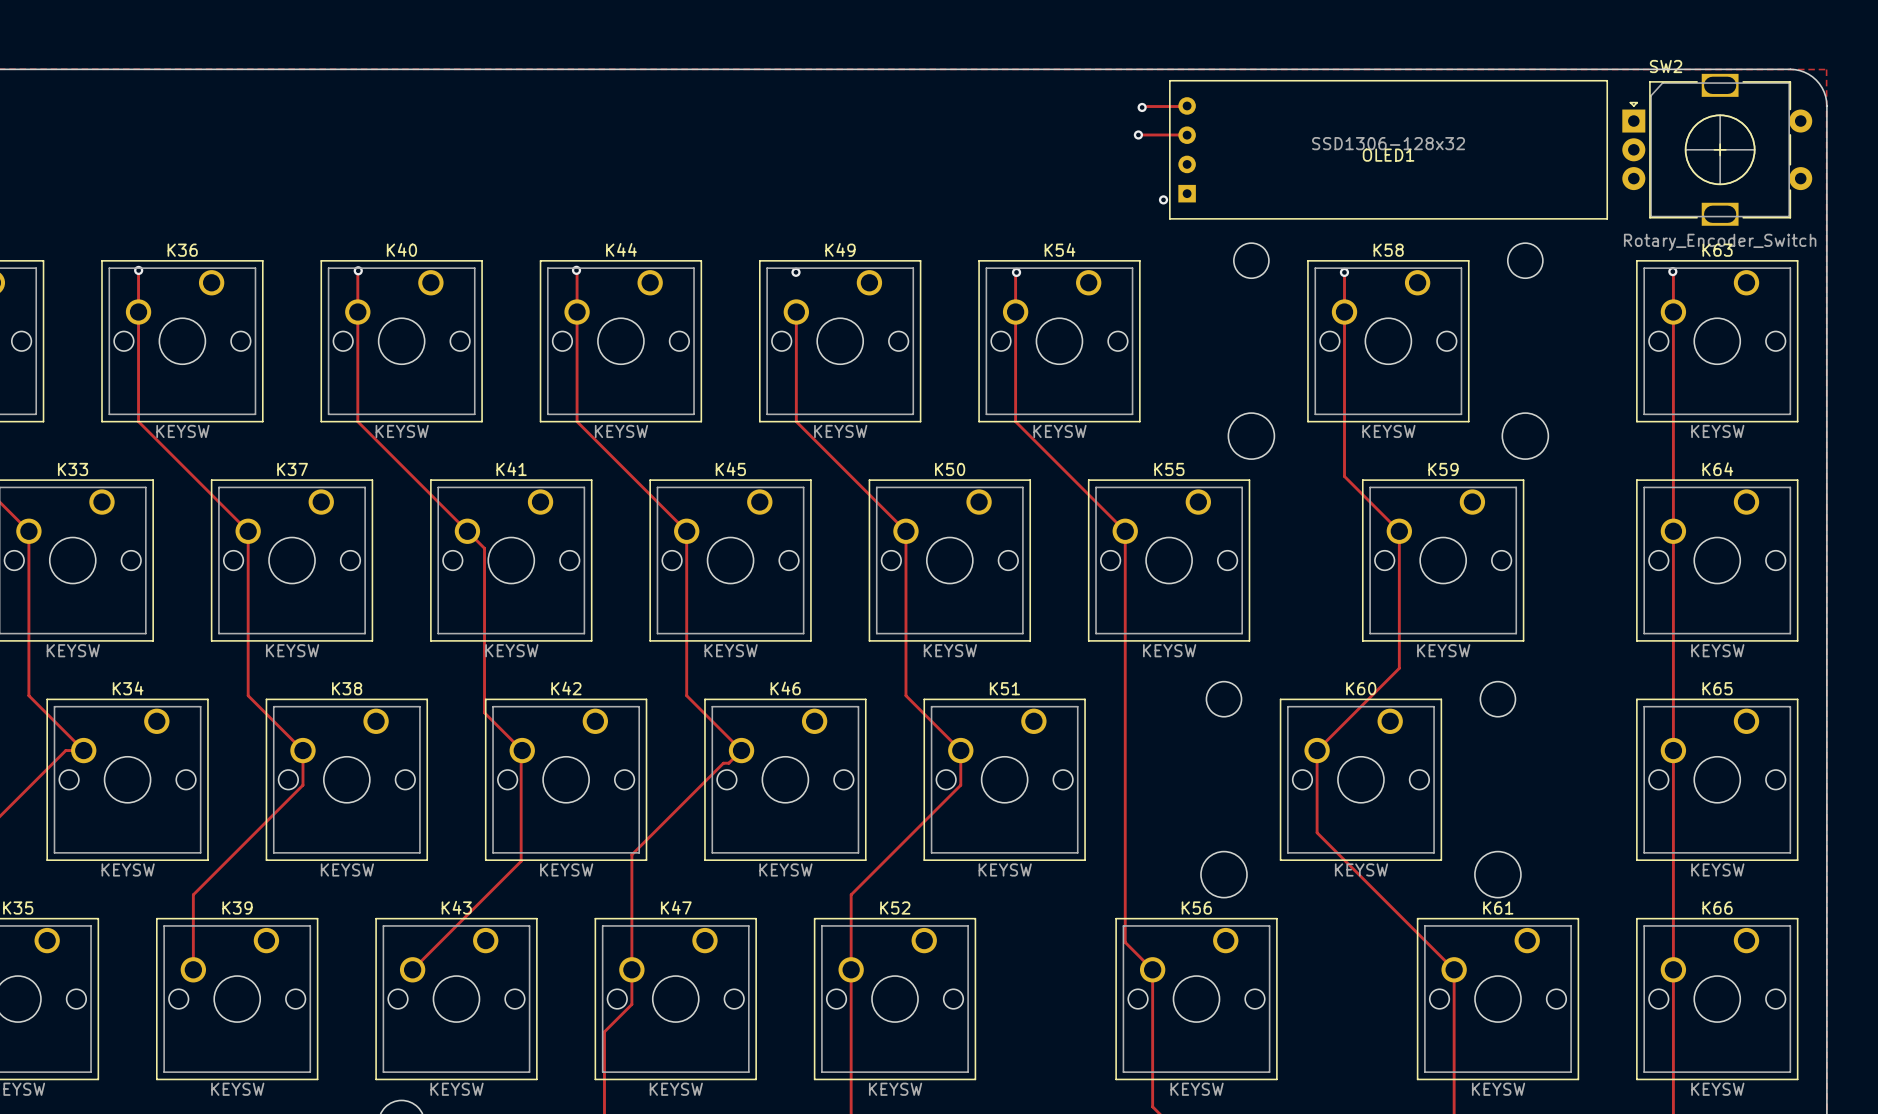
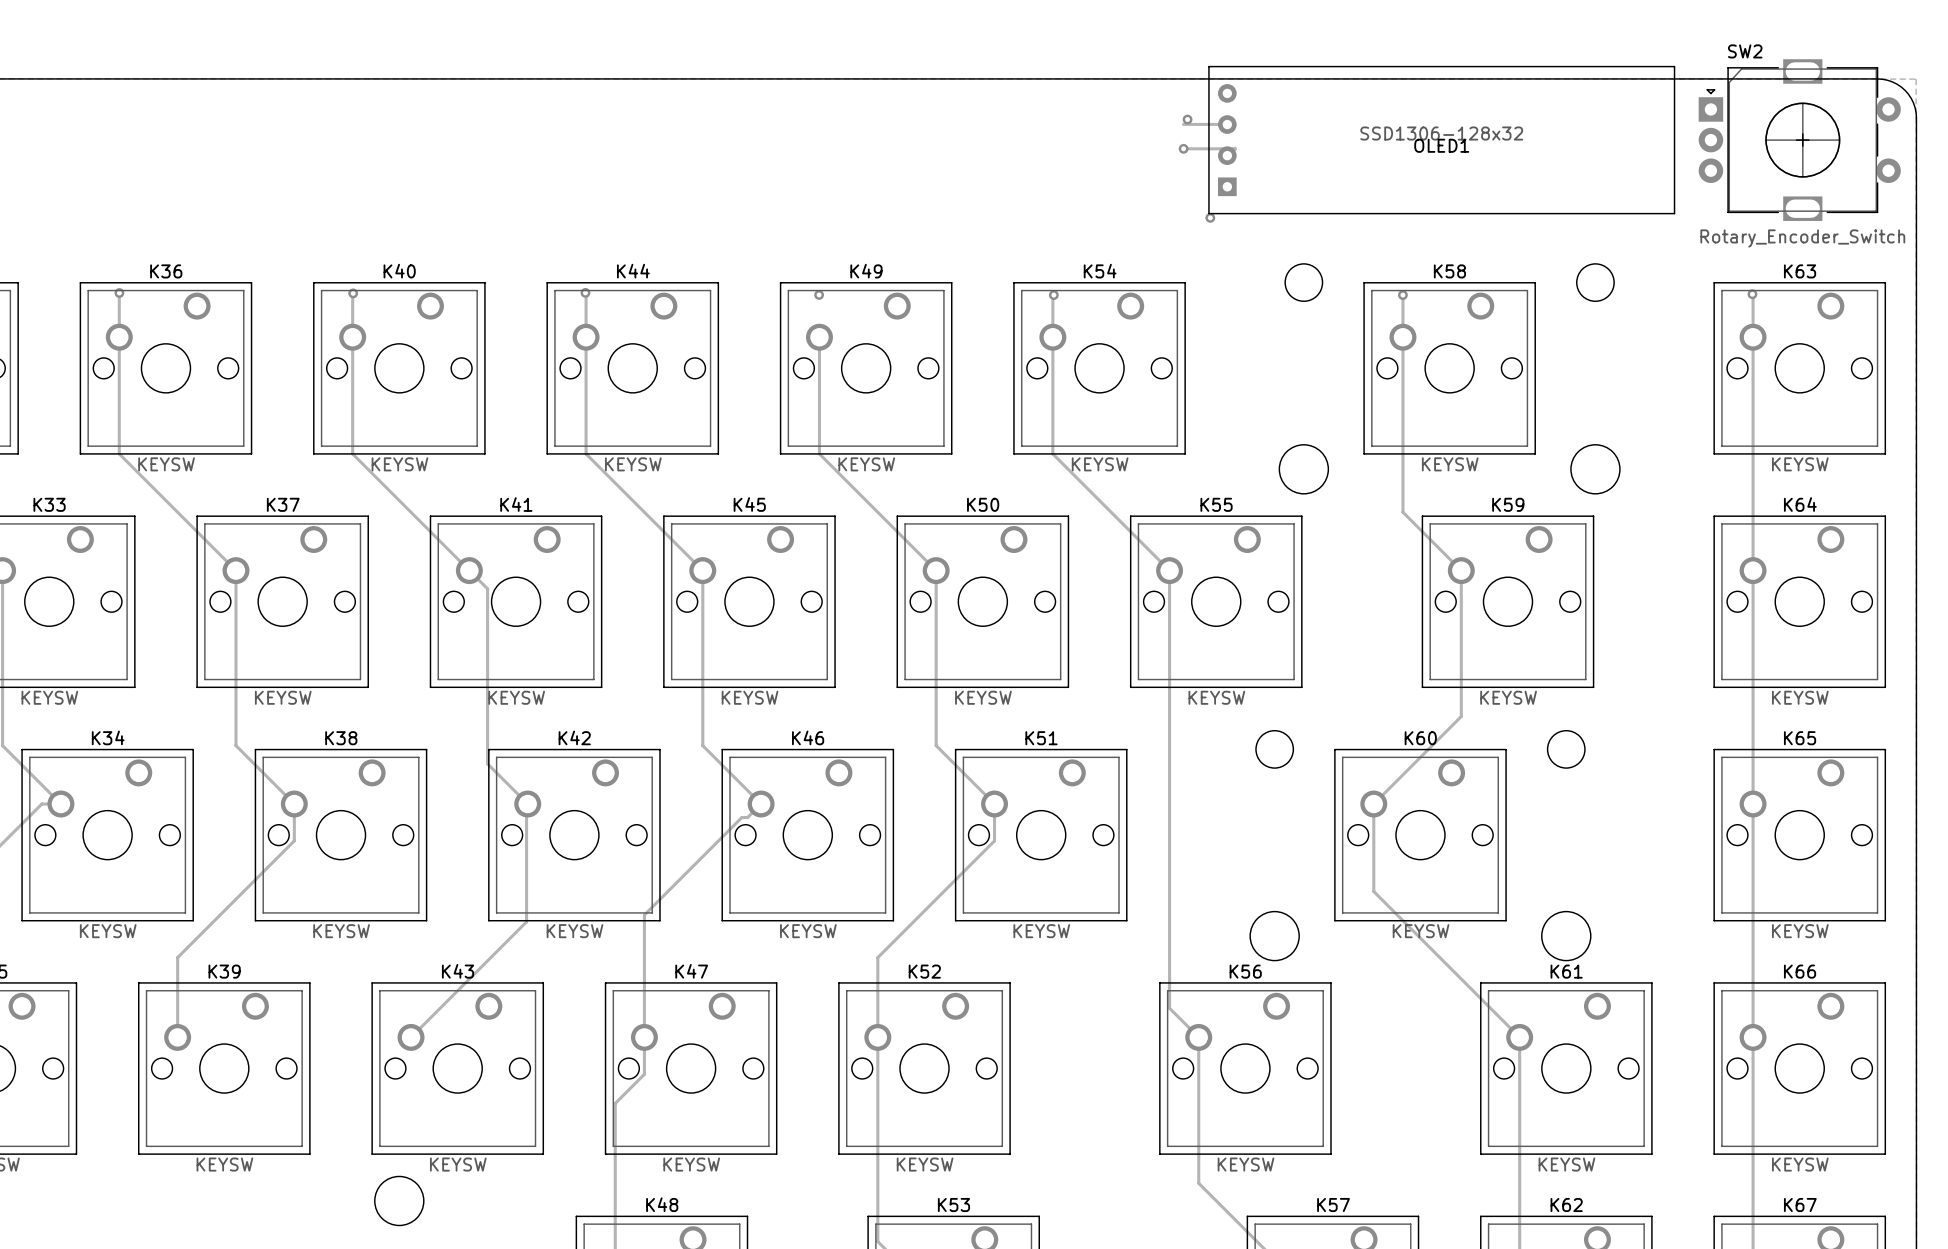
track: (1187, 105) (1147, 106) -> none
track: none -> (1183, 124) (1227, 124)
OLED1 position: (1388, 149) -> (1441, 140)
SW2 position: (1717, 149) -> (1799, 140)

